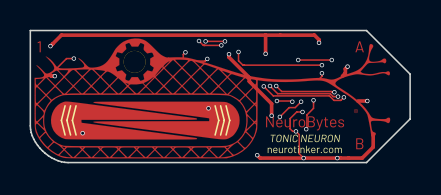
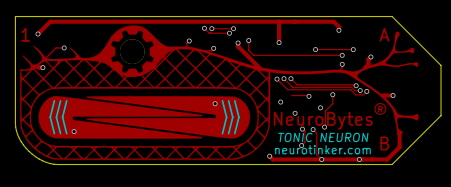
track: (249, 77) (249, 81) (271, 103) (271, 115) -> none
via: (276, 101) -> none
track: (301, 101) (295, 107) (289, 107) (279, 116) -> none
via: (301, 101) -> none
via: none -> (280, 102)
track: (302, 111) (296, 111) (290, 118) (290, 128) (295, 131) -> none
via: (271, 115) -> none
track: none -> (302, 129) (304, 131) (304, 142) (301, 145)
via: none -> (302, 129)
via: none -> (301, 145)

